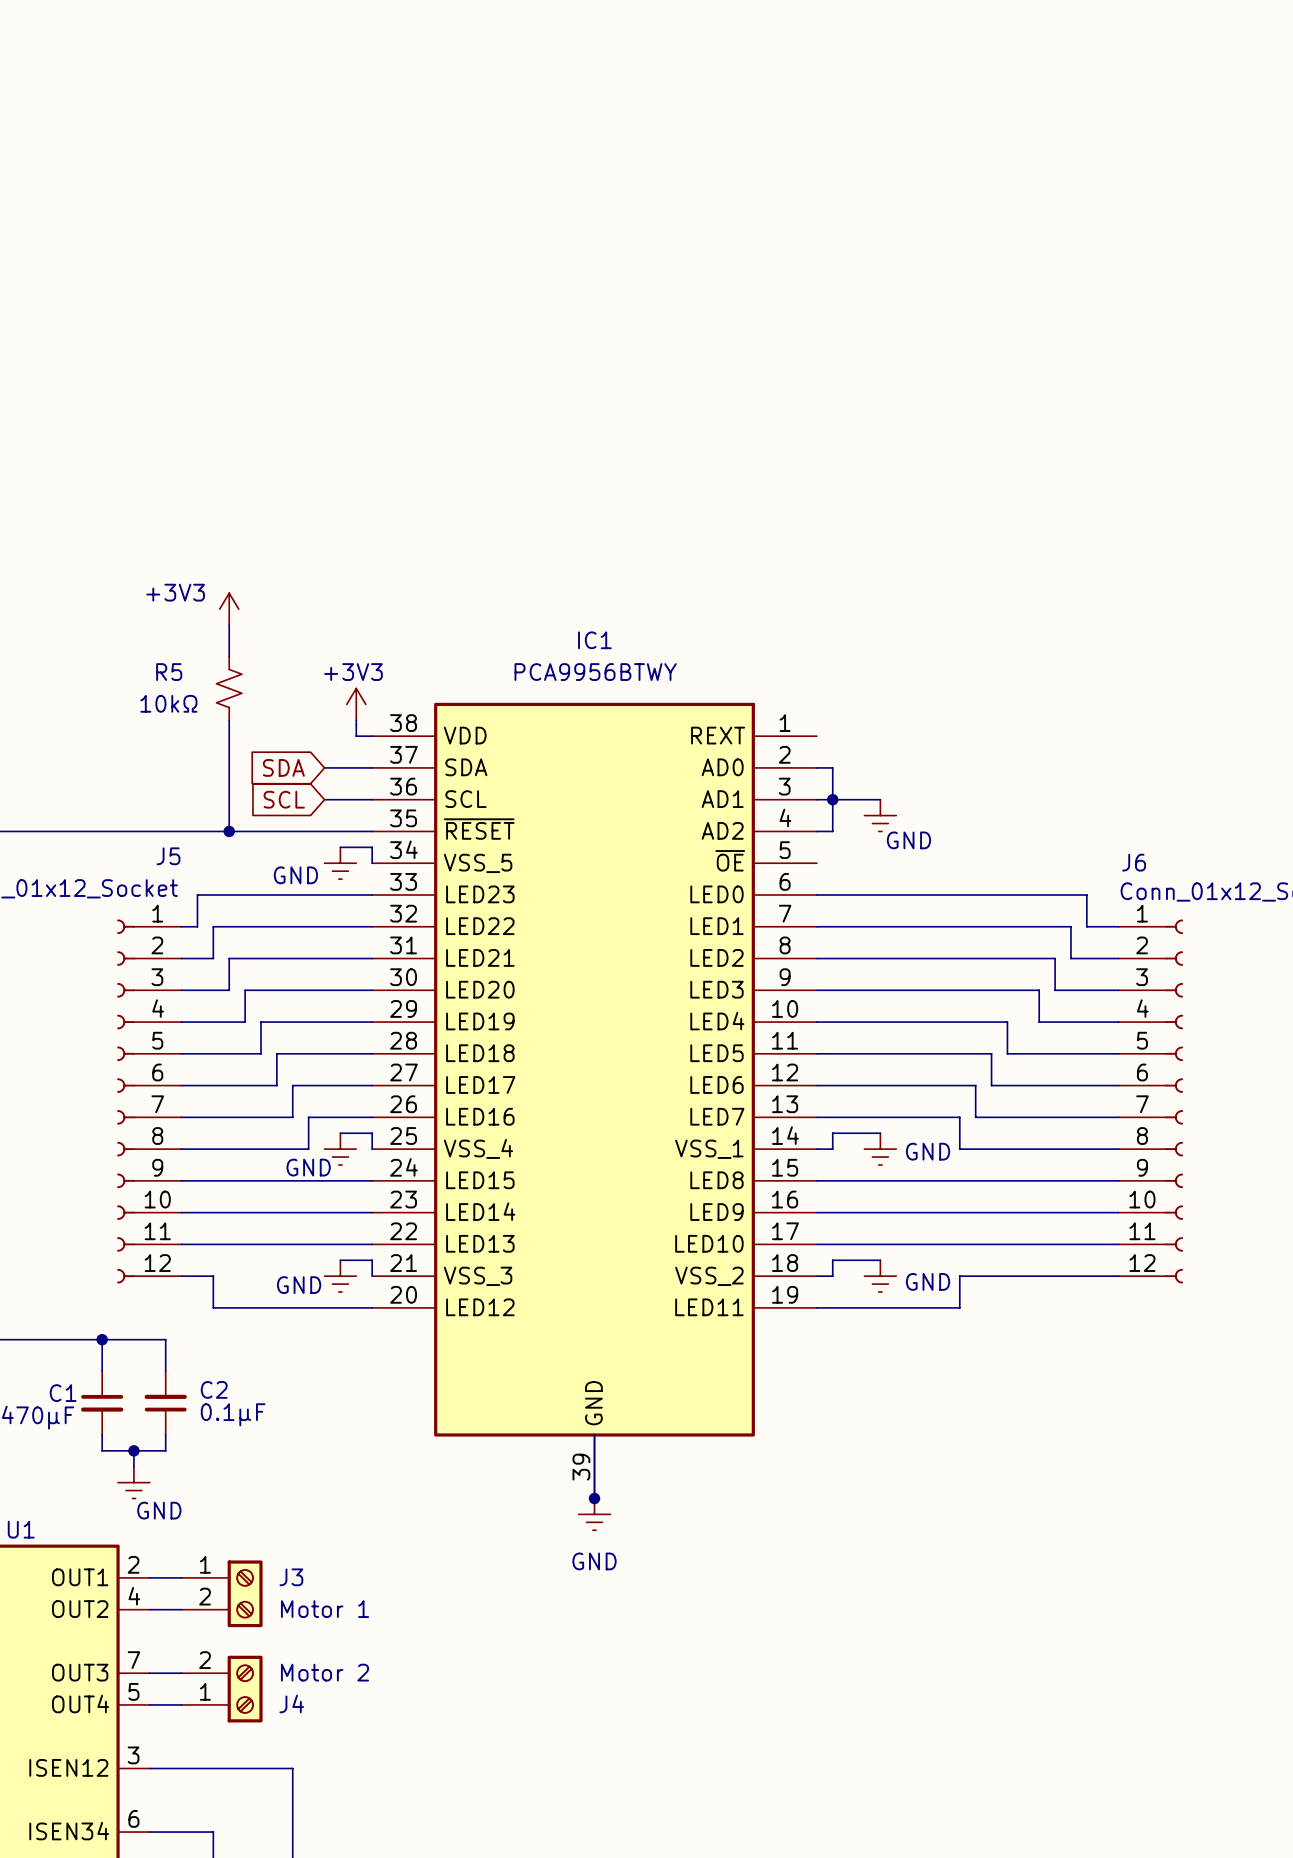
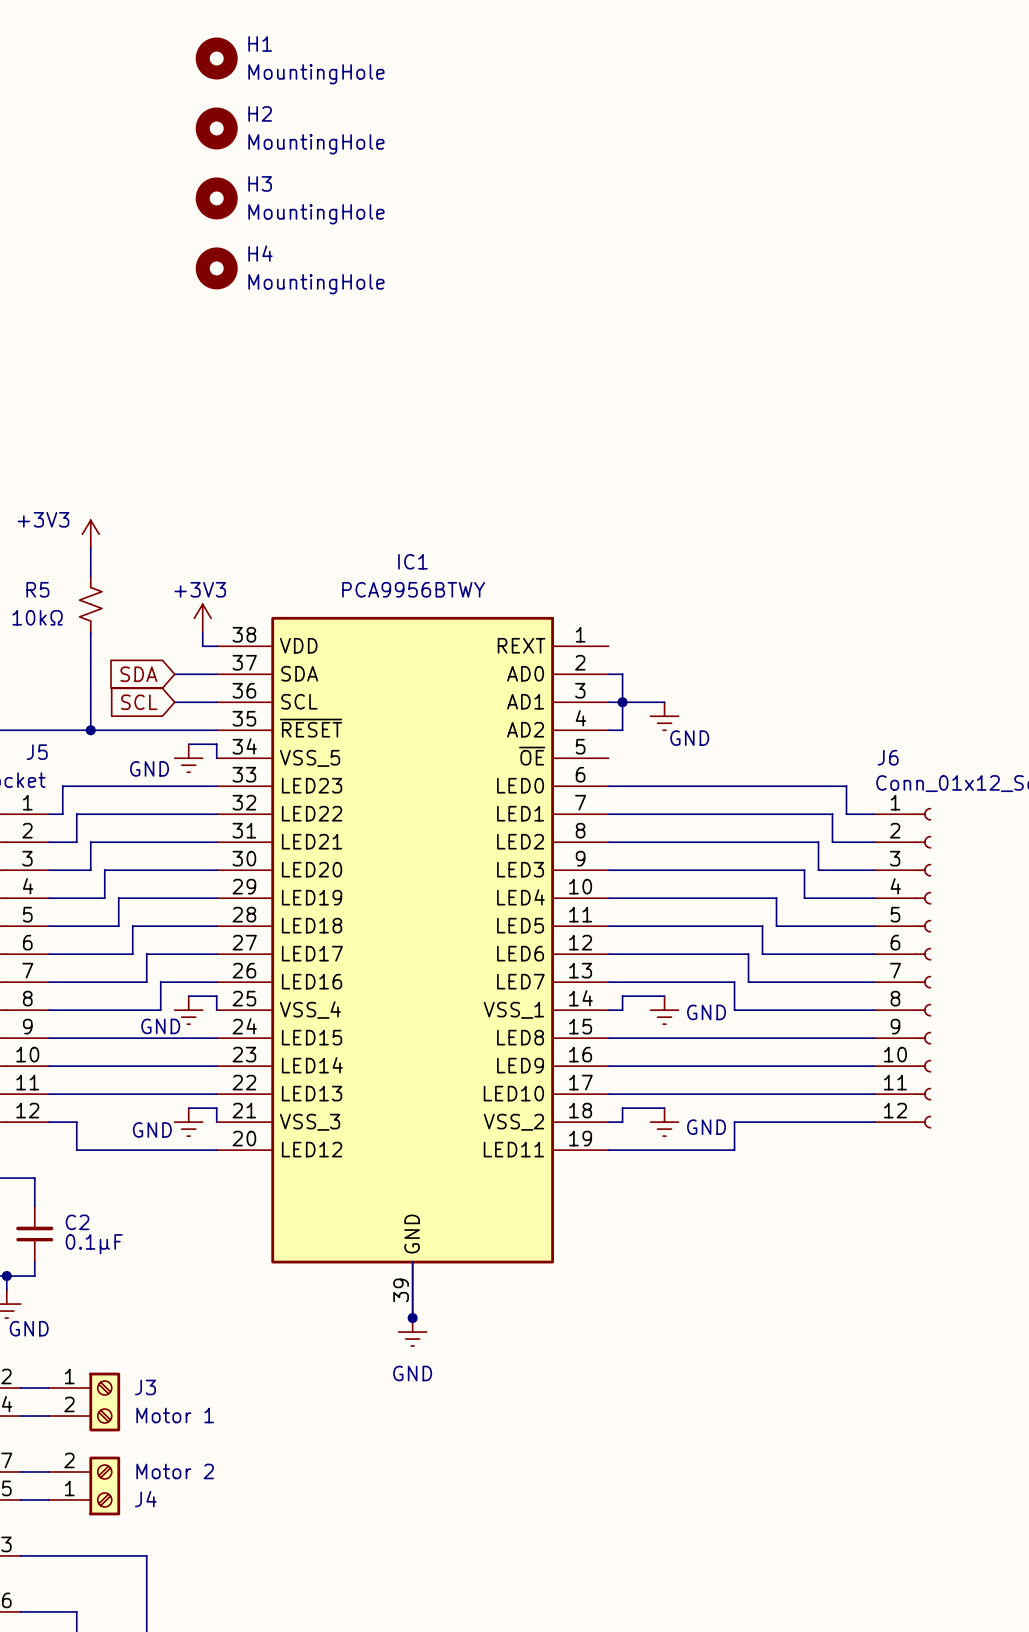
H1: none -> MountingHole (216, 58)
H2: none -> MountingHole (216, 128)
H3: none -> MountingHole (216, 198)
H4: none -> MountingHole (216, 268)

